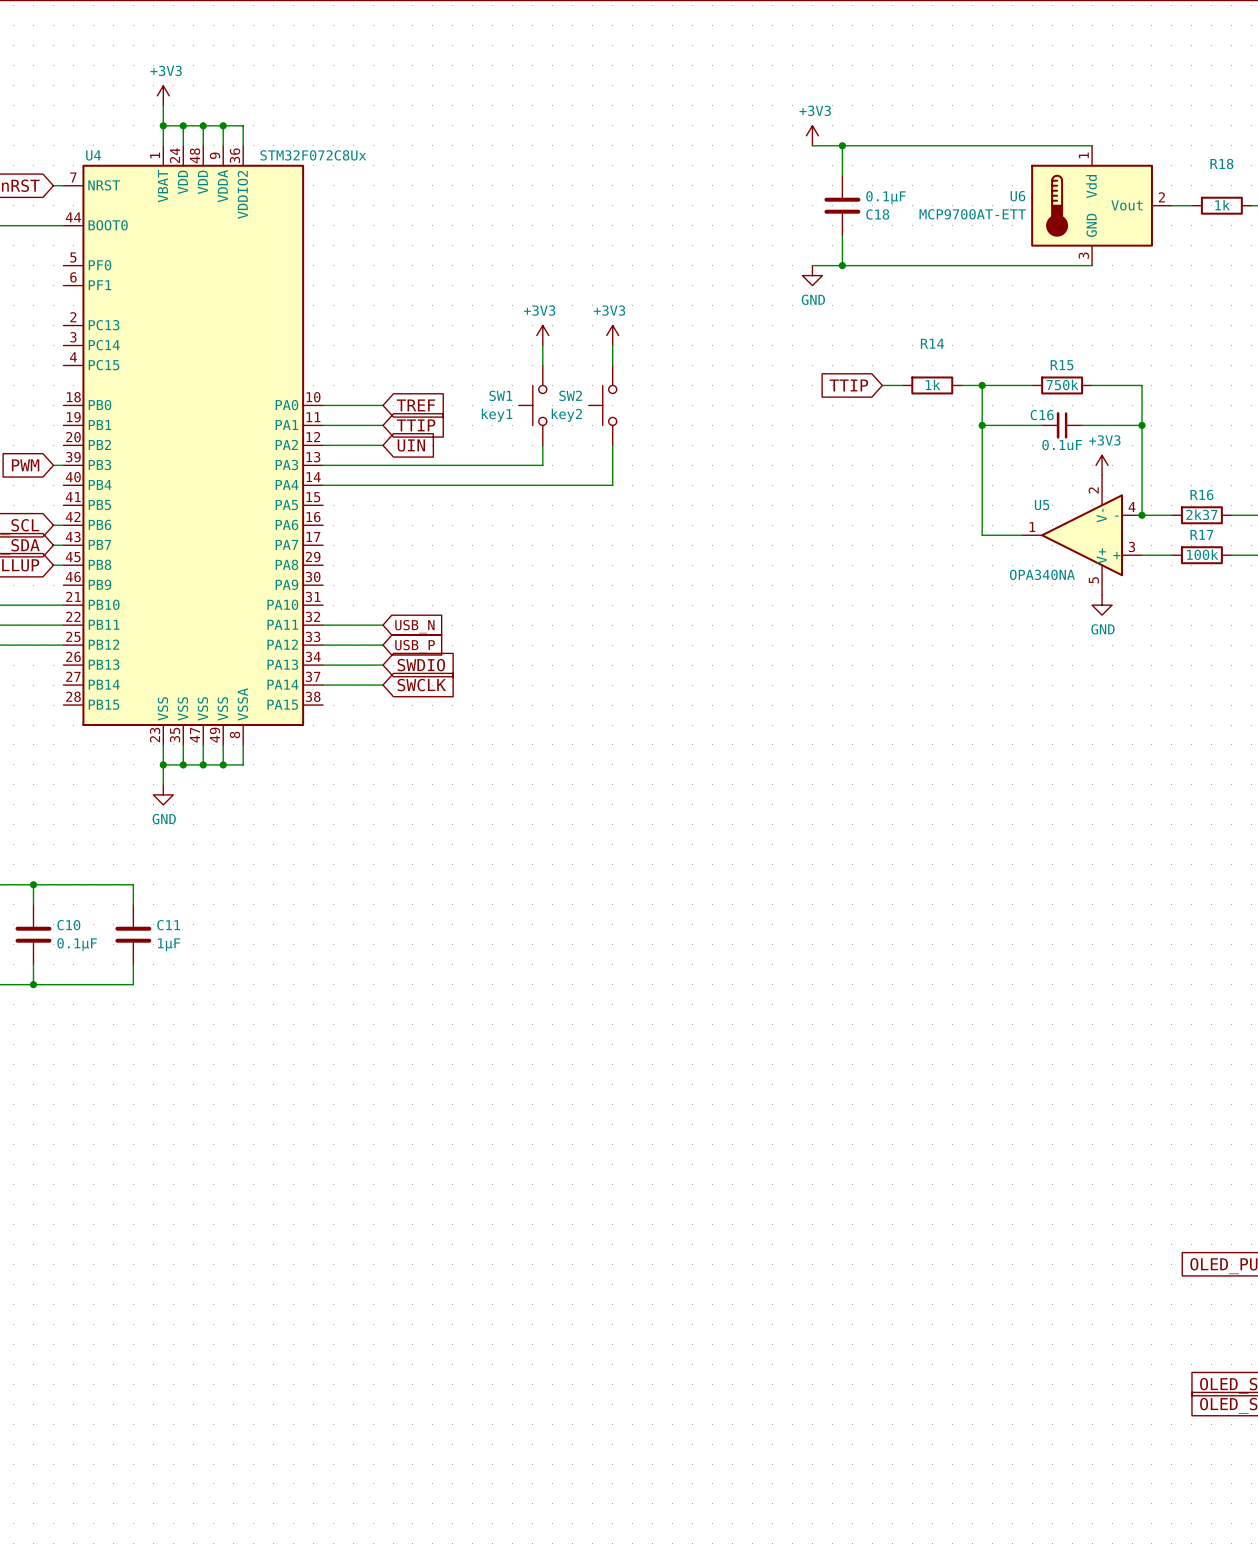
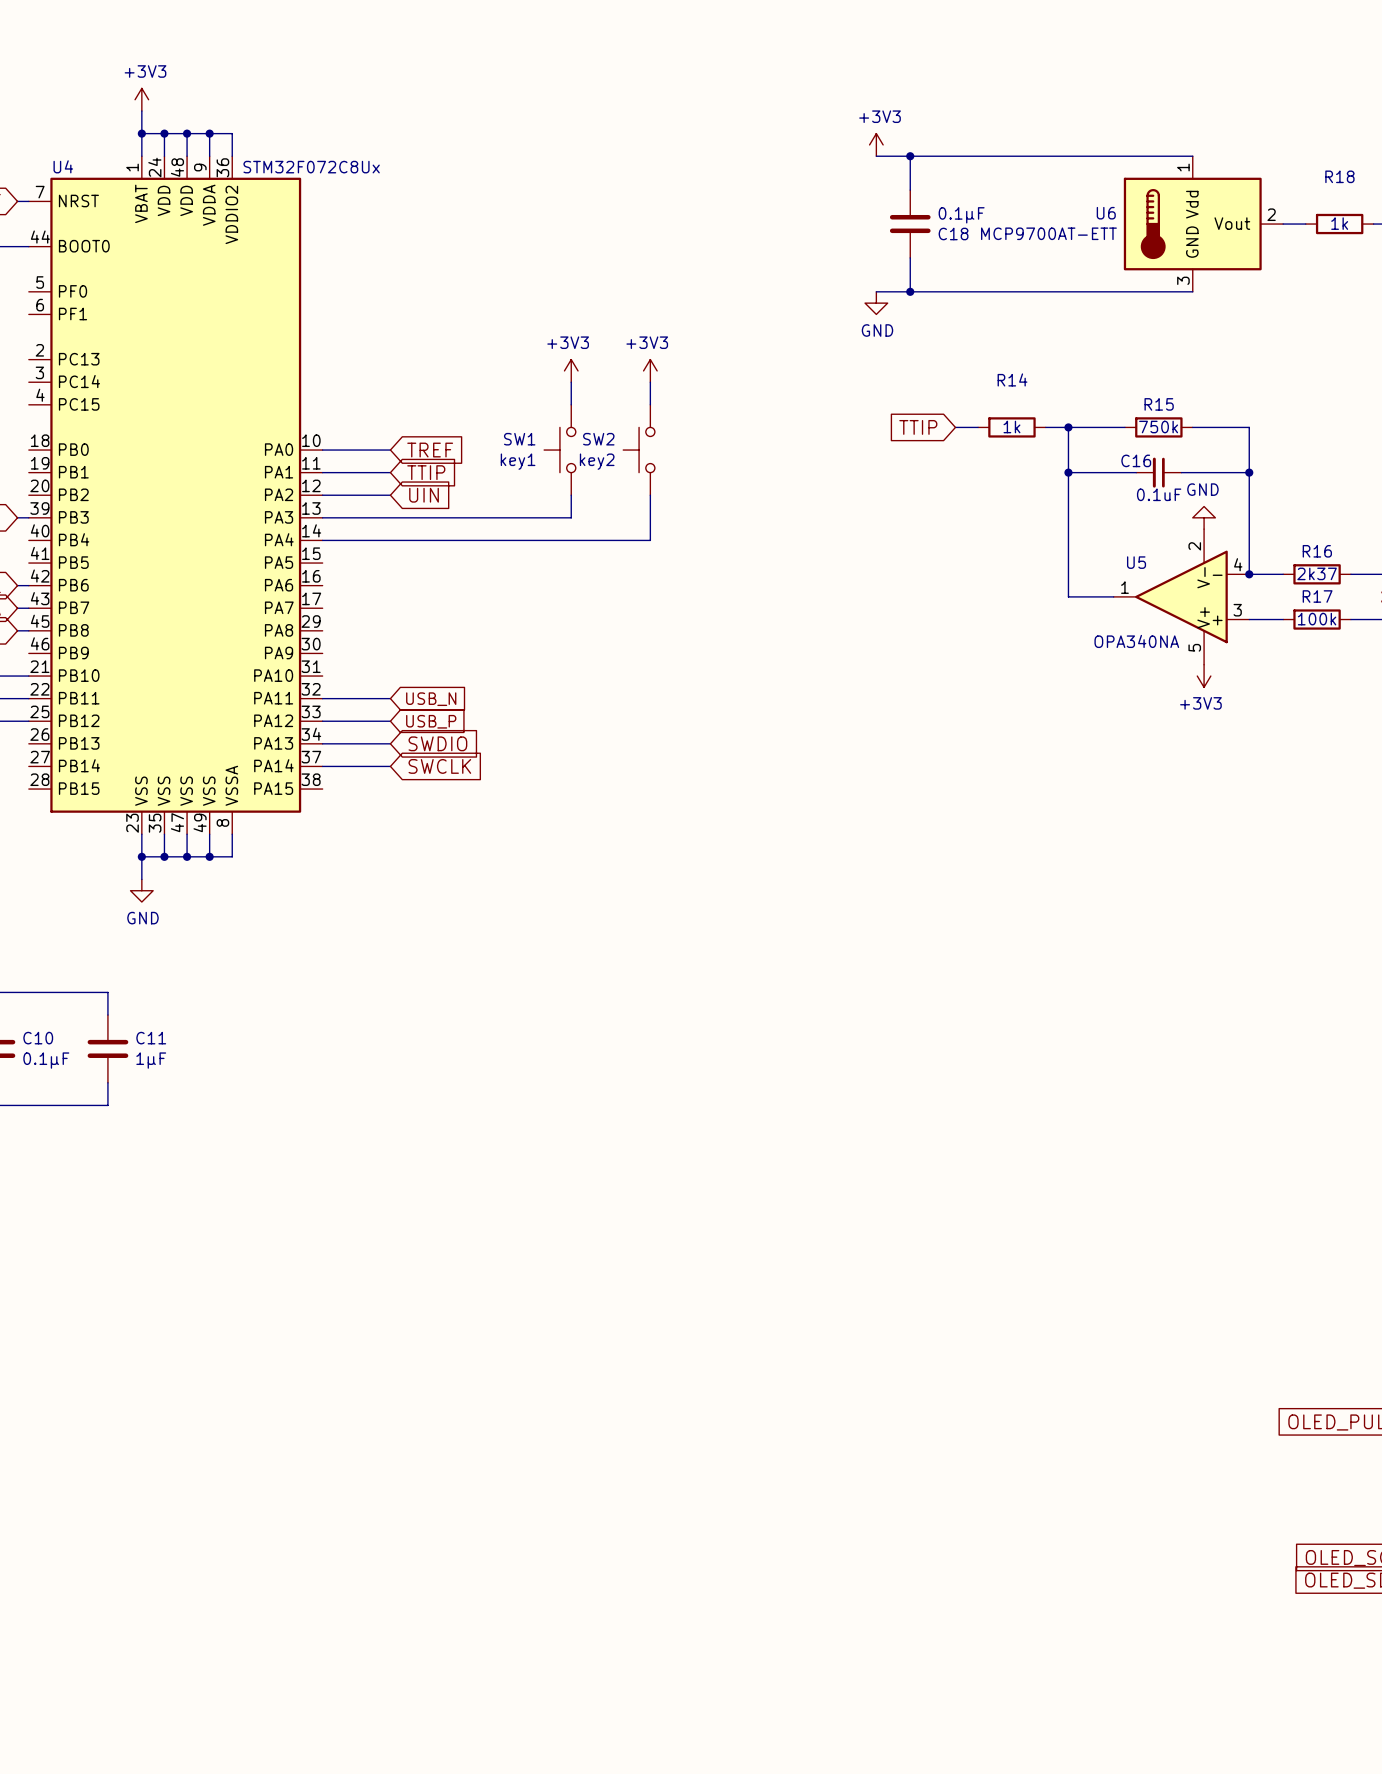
power symbol: +3V3 (1102, 465) -> GND (1204, 517)
power symbol: GND (1102, 605) -> +3V3 (1204, 676)

